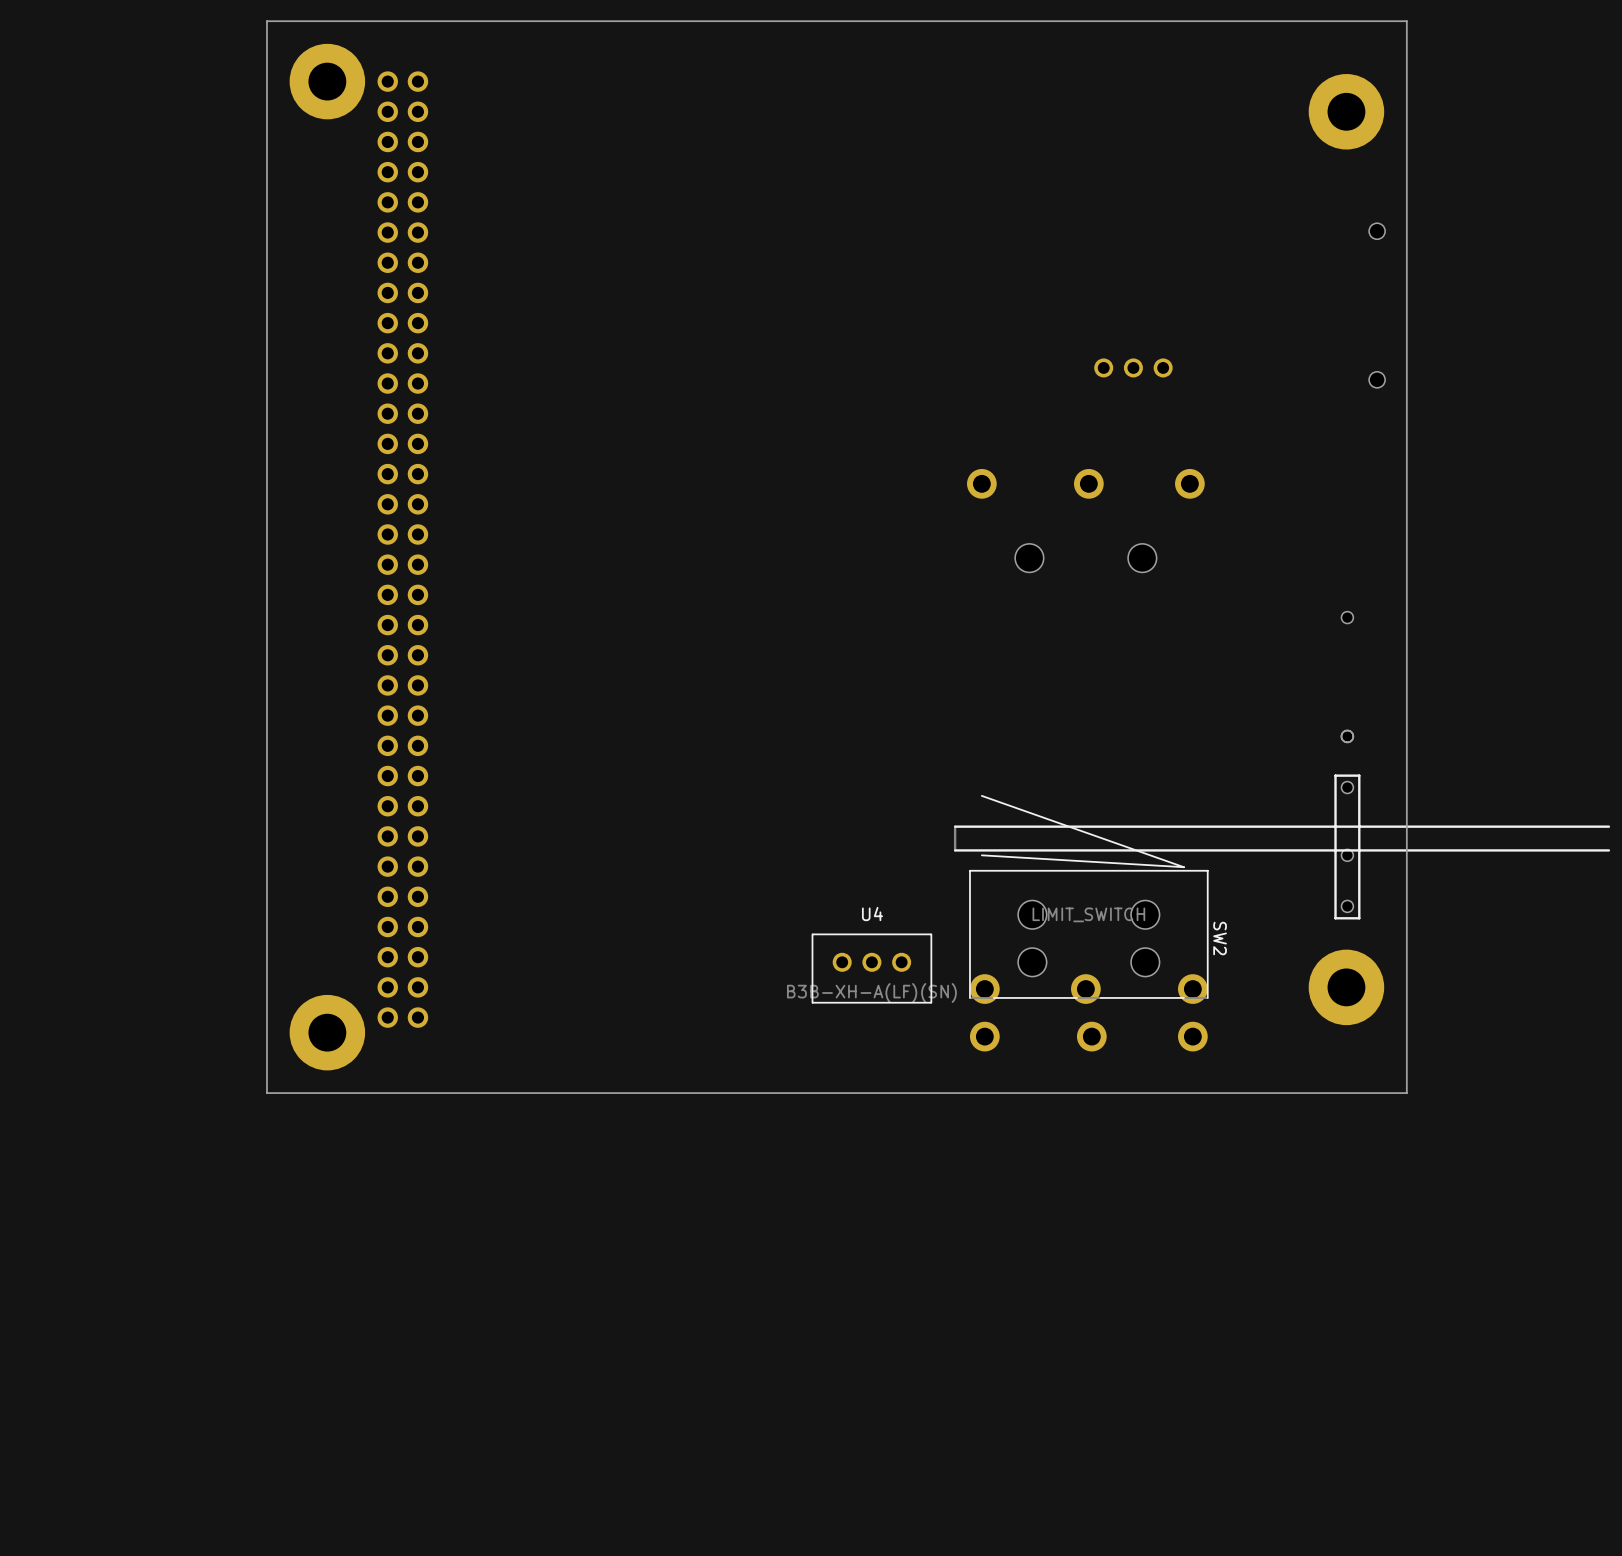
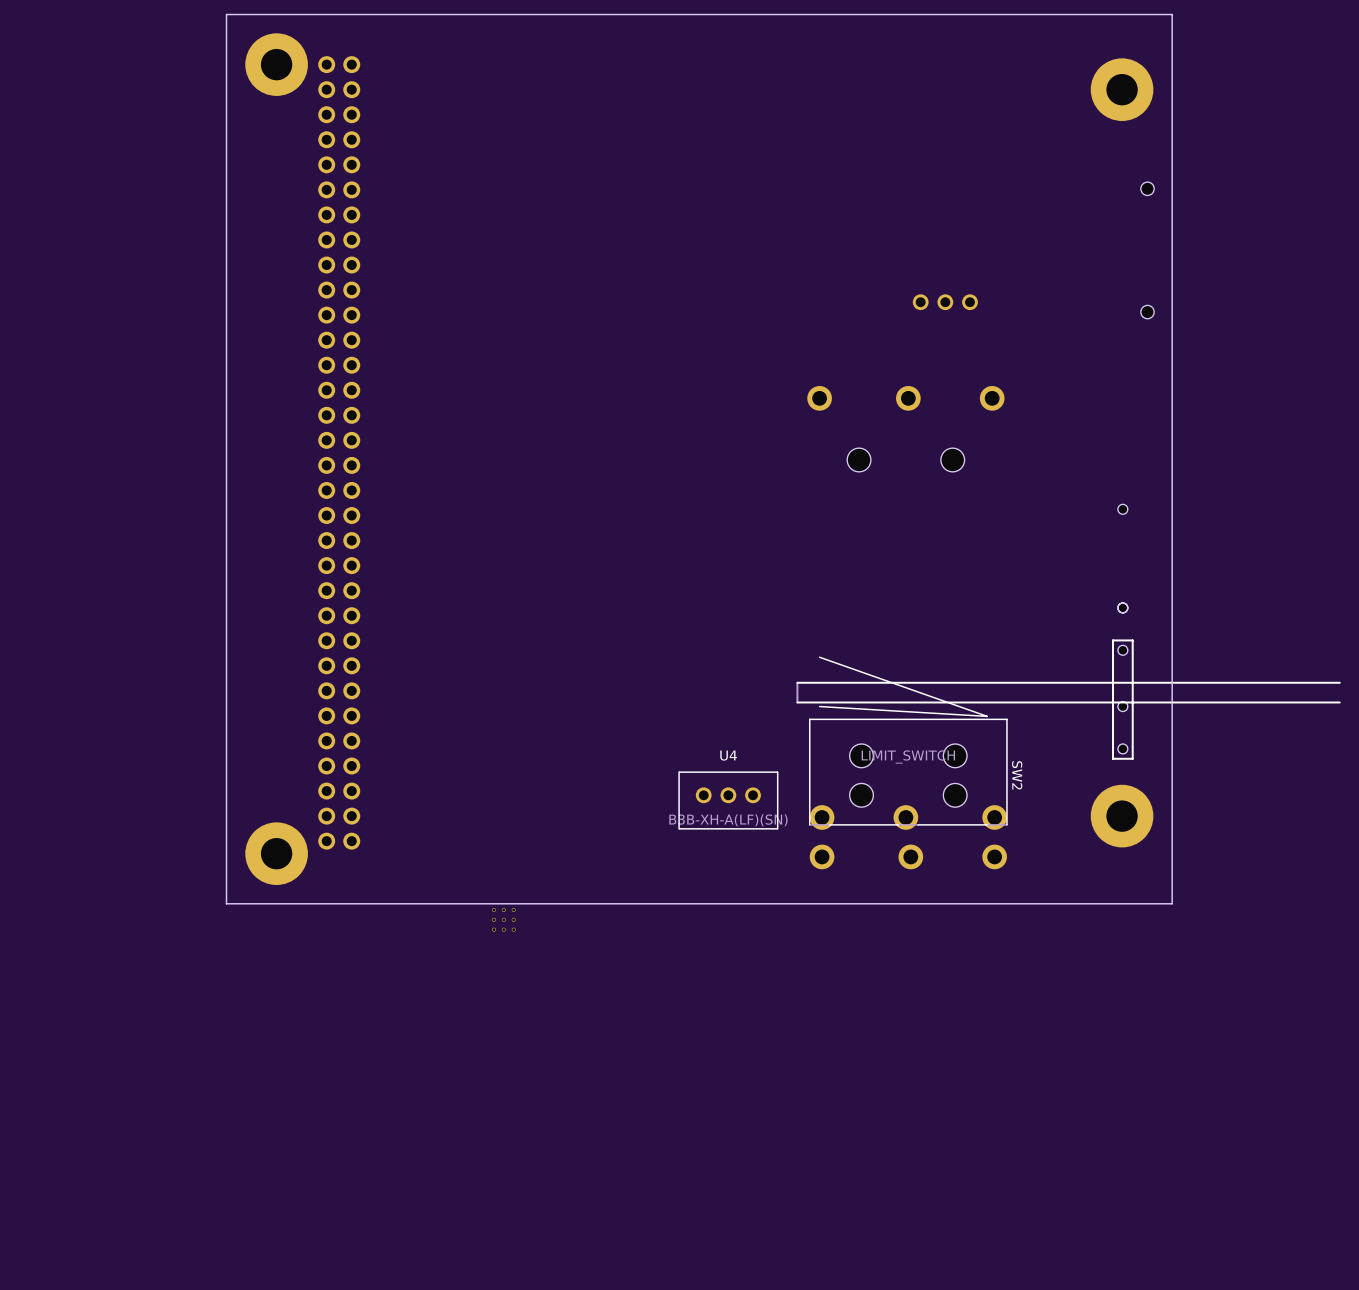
part: none -> (503, 919)

